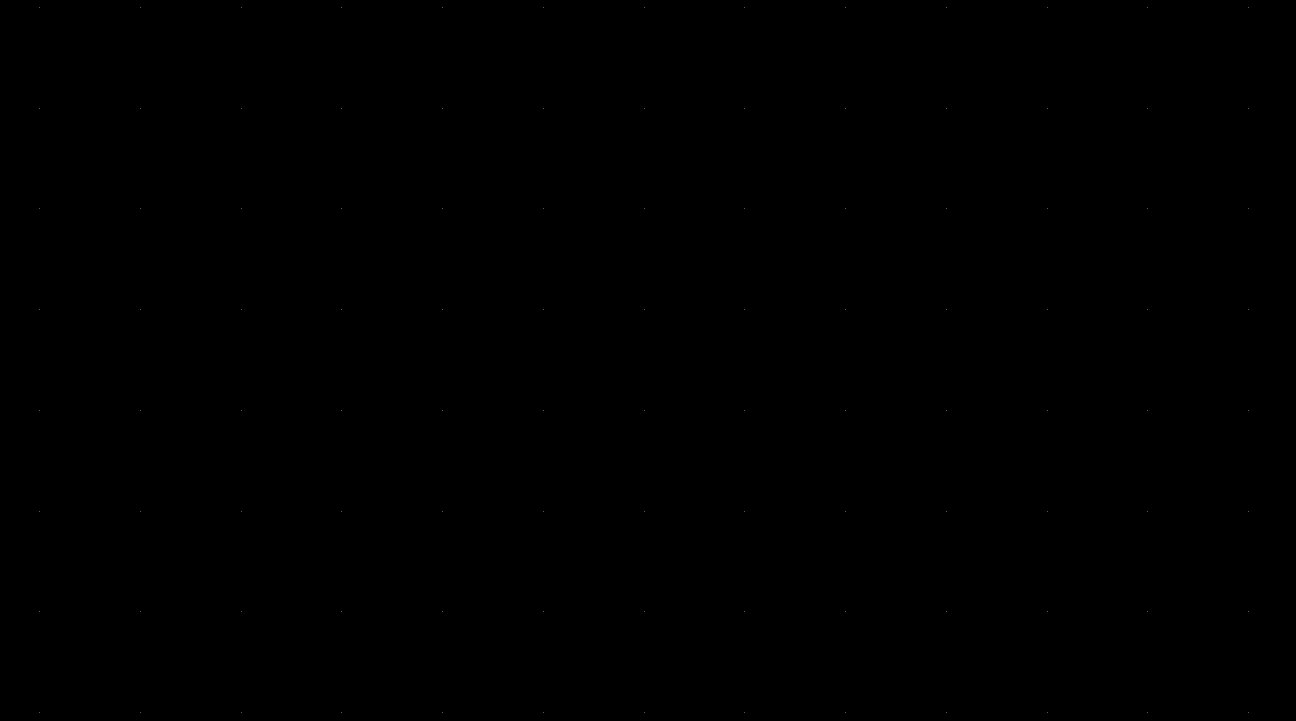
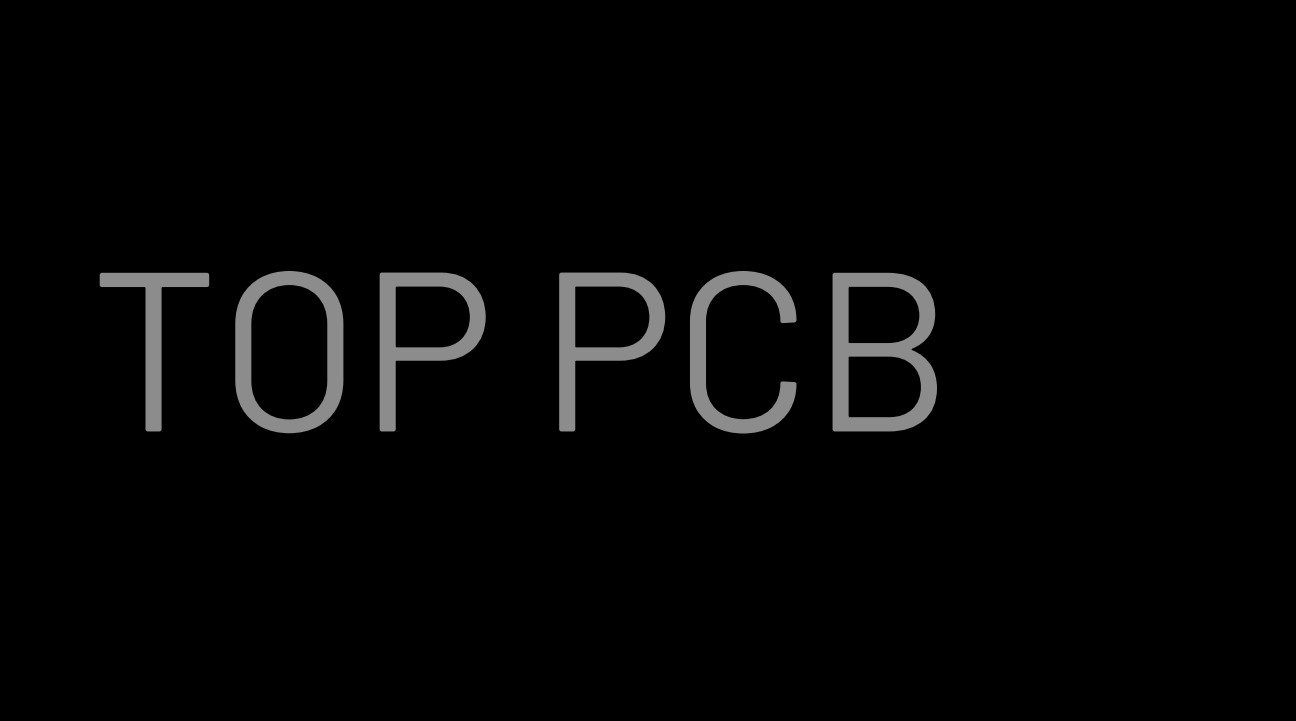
text: none -> TOP PCB (518, 352)

